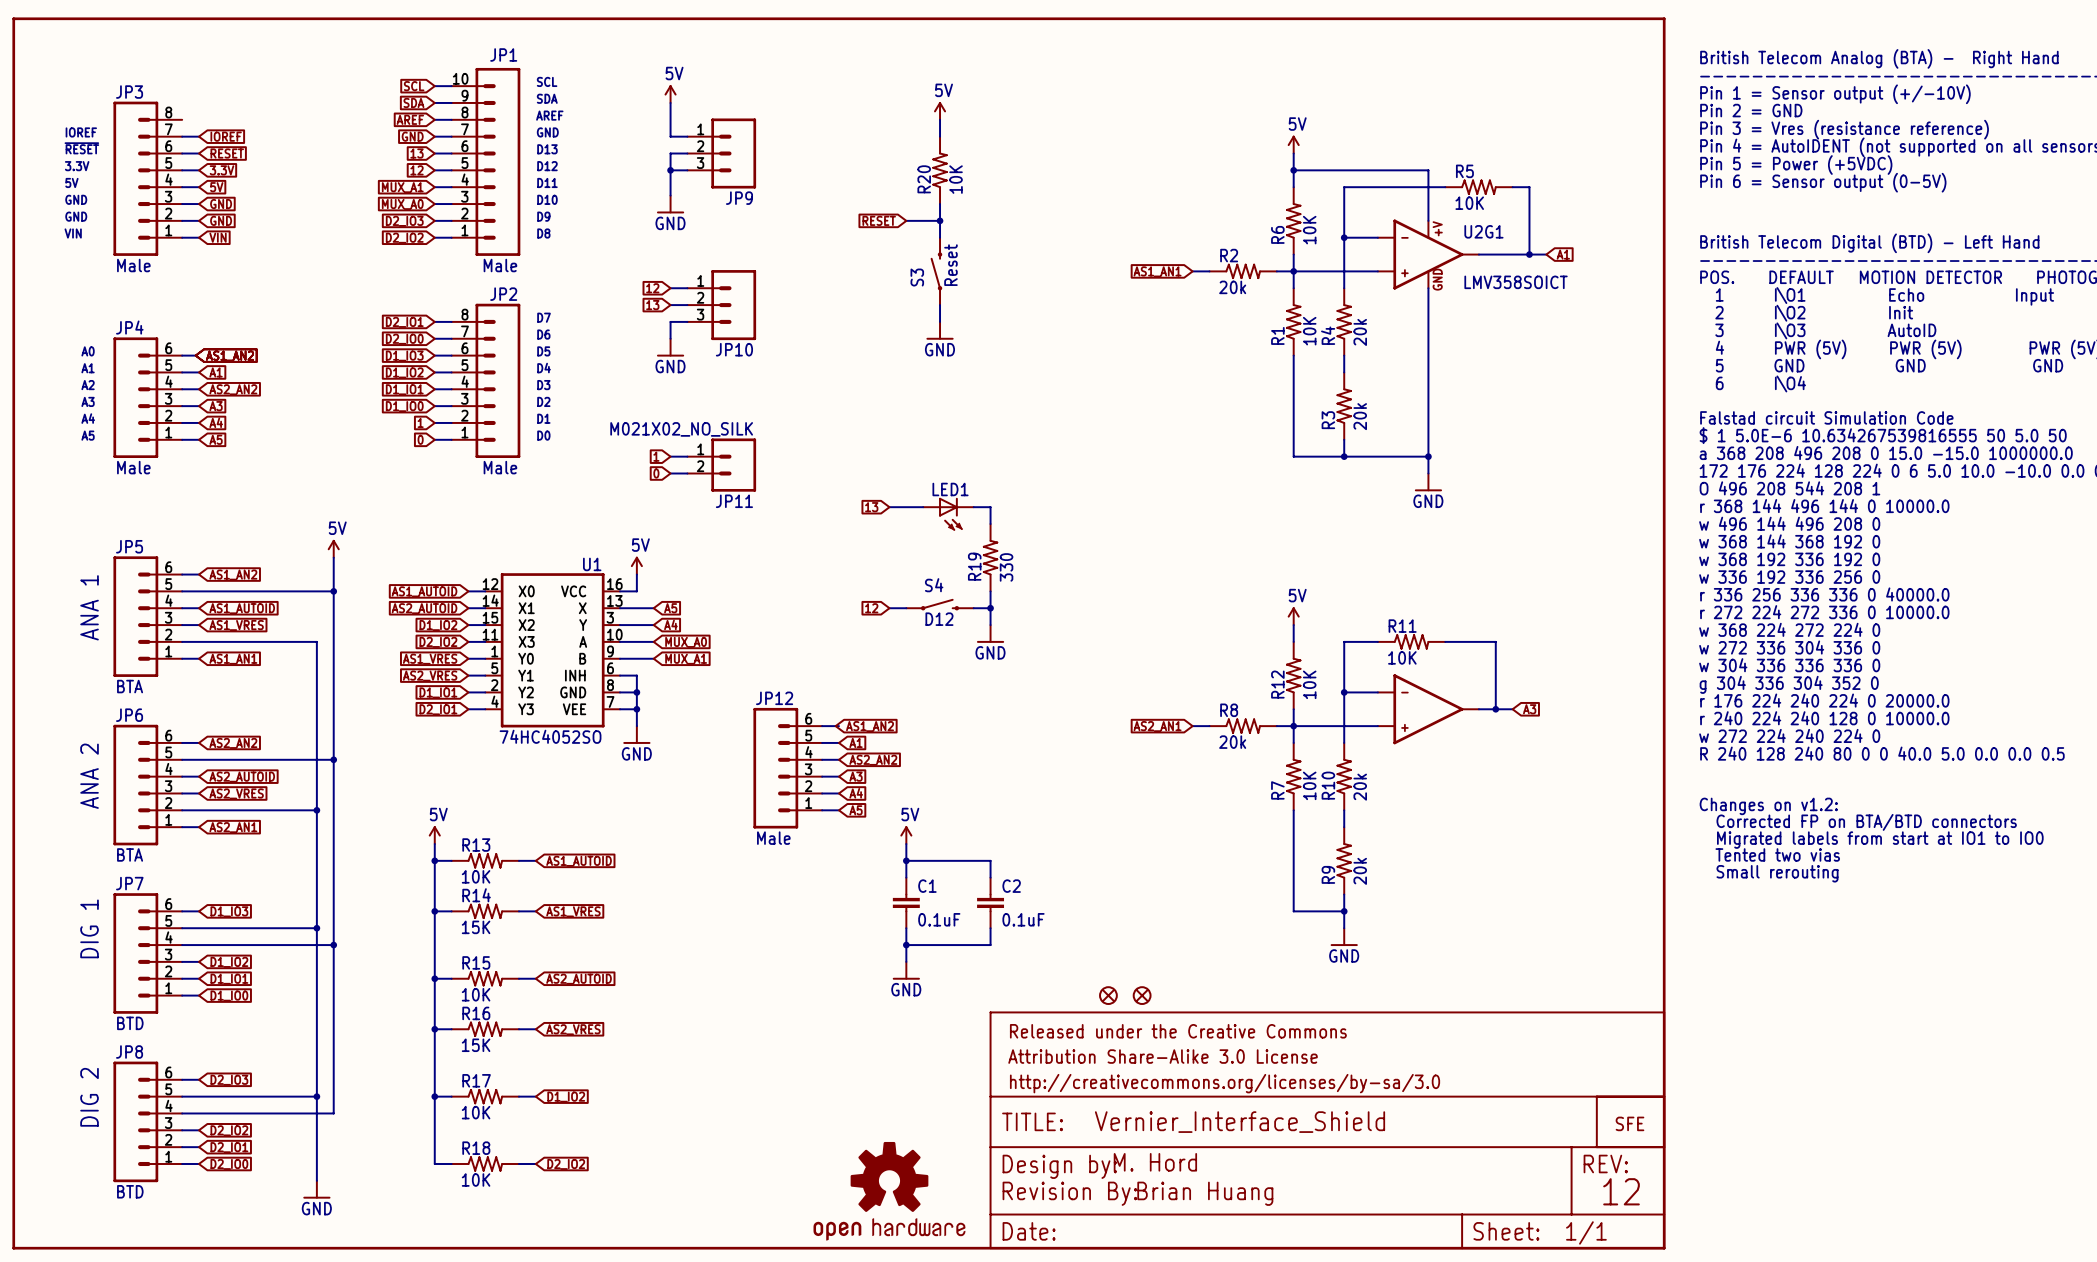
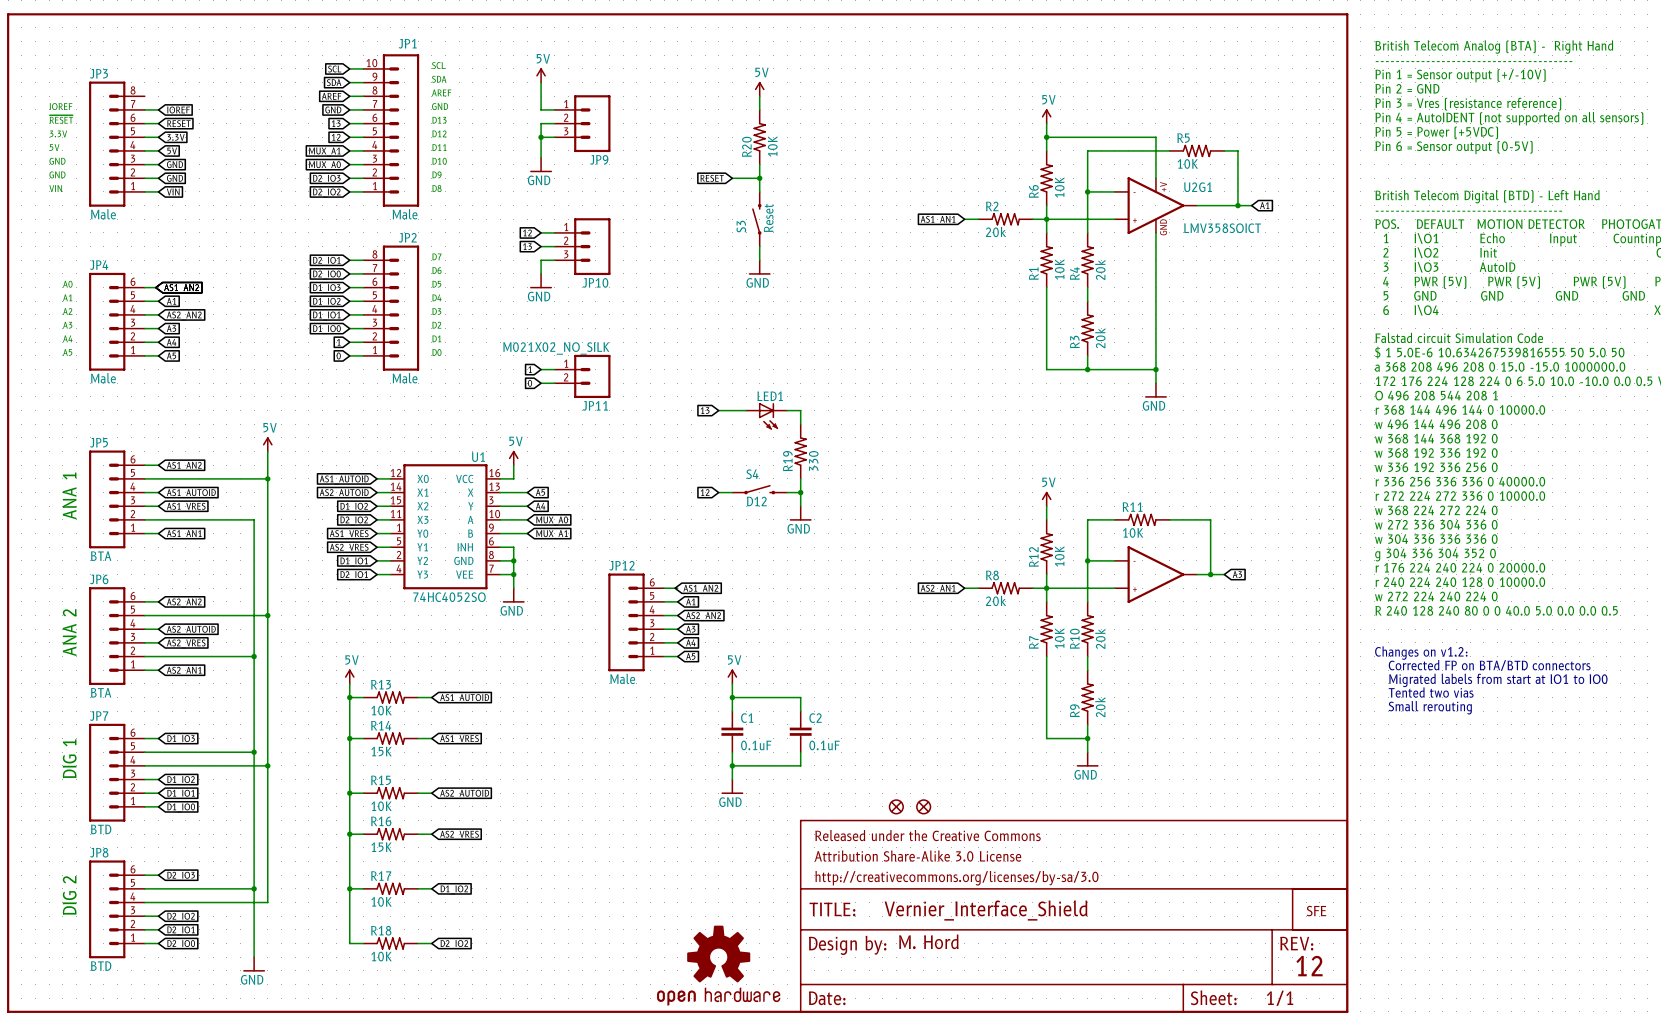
part: (1069, 1193) -> none
text: Brian Huang (1205, 1193) -> none

